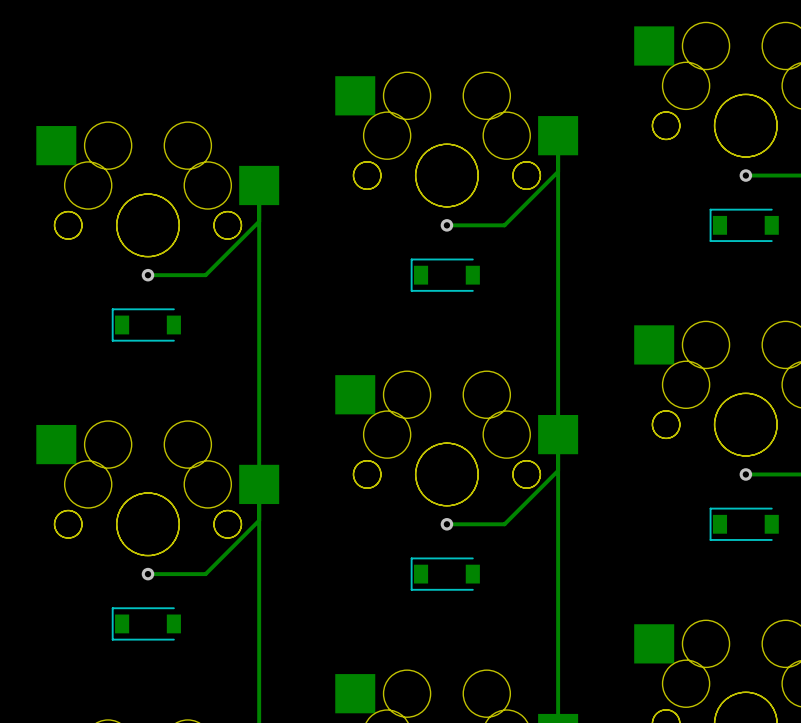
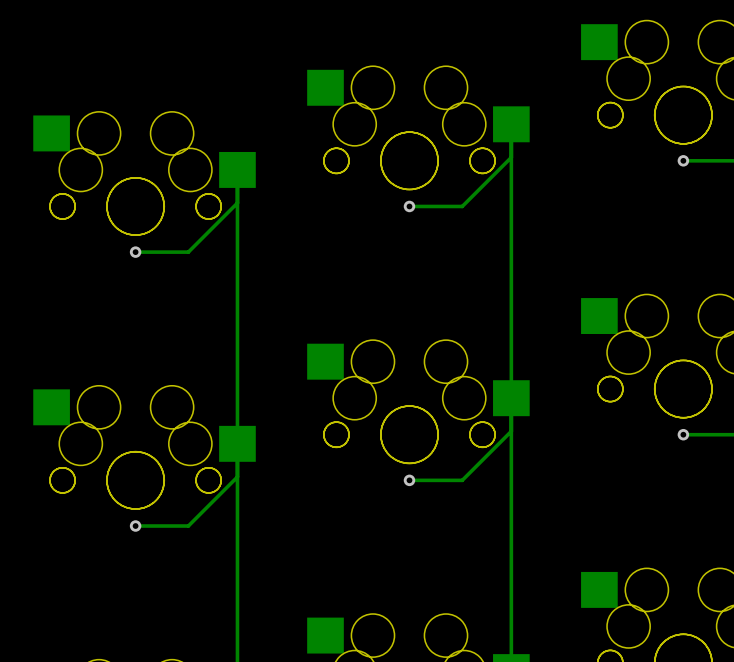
part: (744, 225) -> none
part: (445, 275) -> none
part: (146, 325) -> none
part: (744, 524) -> none
part: (445, 574) -> none
part: (146, 623) -> none

